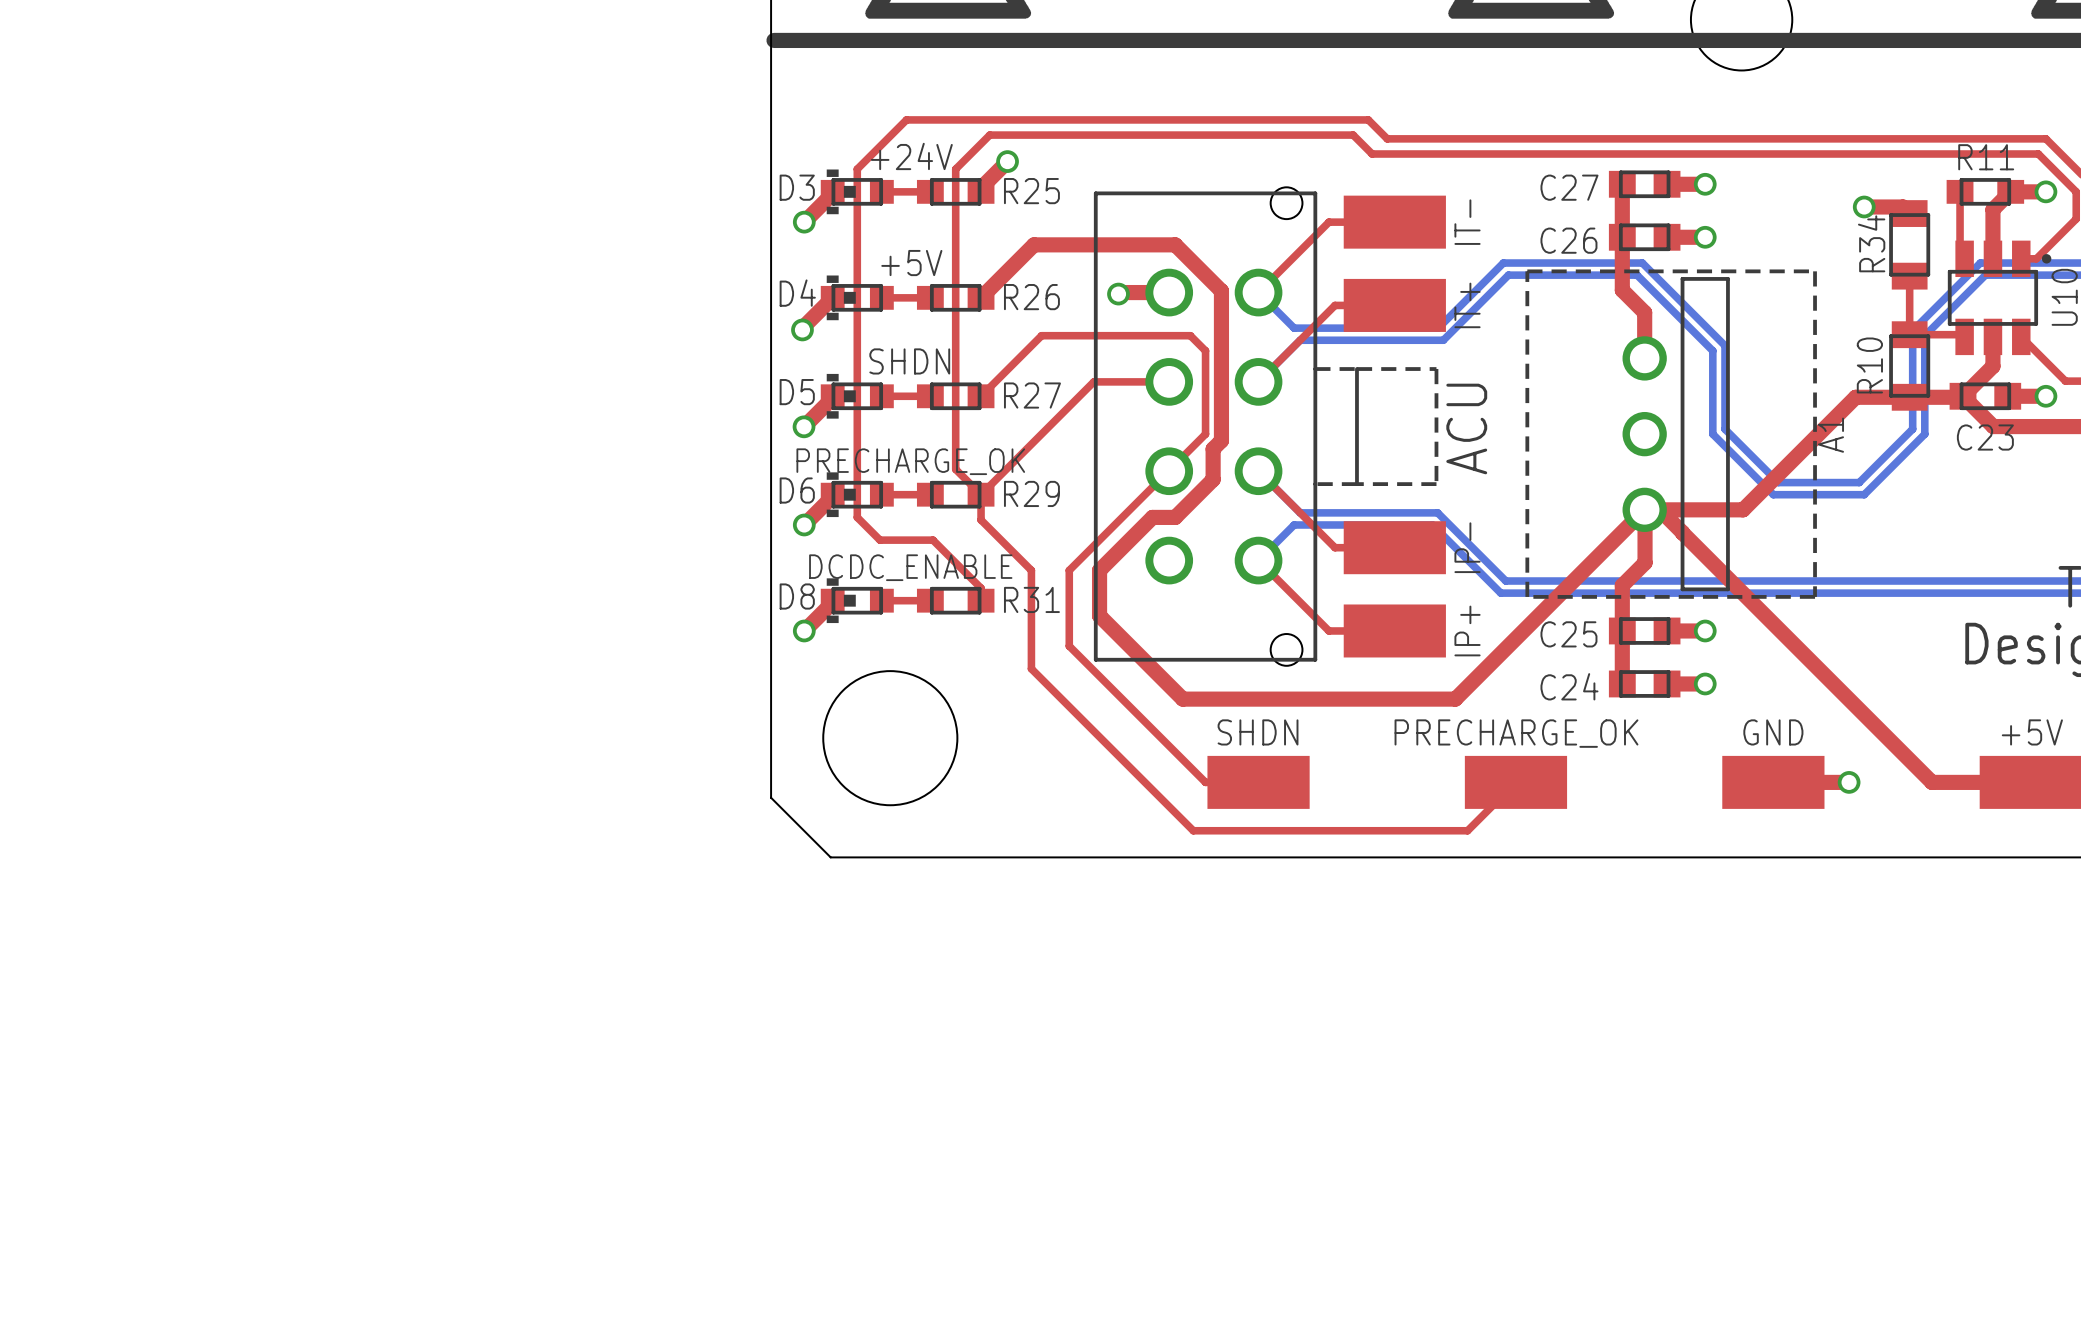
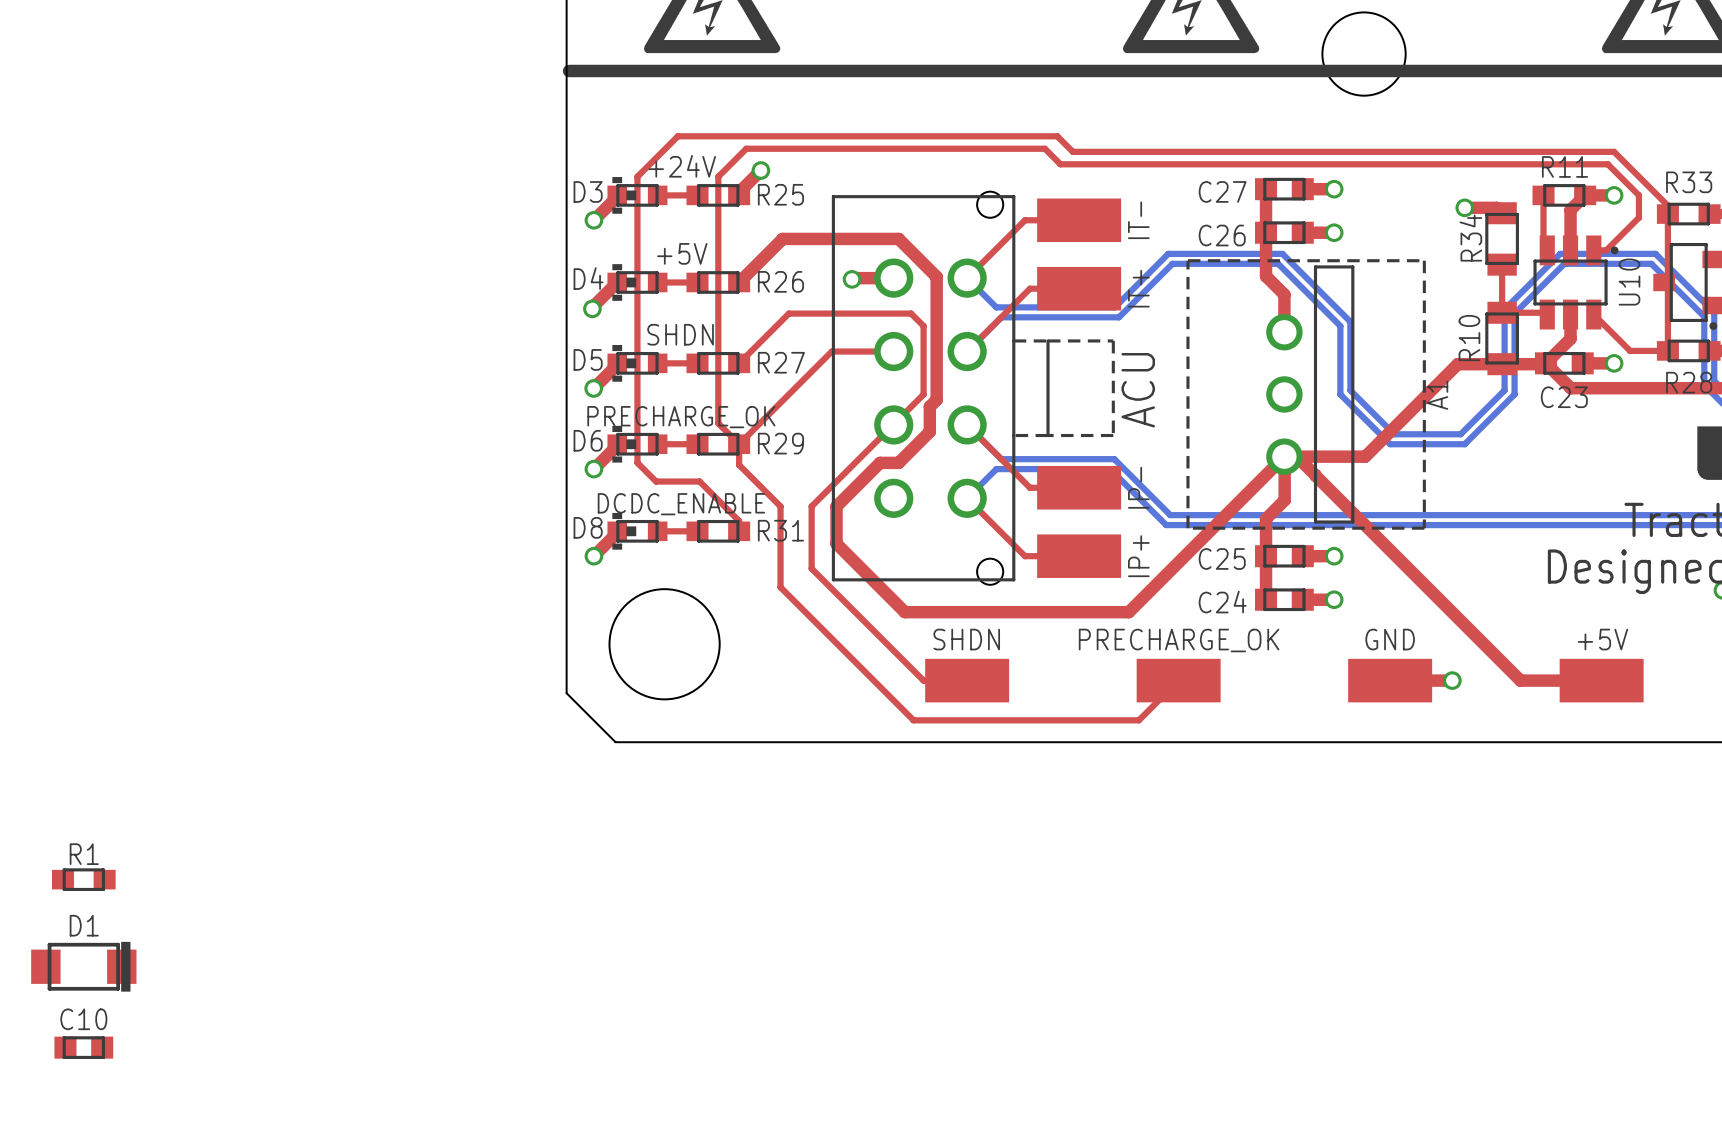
R1: none -> (83, 879)
D1: none -> (83, 966)
C10: none -> (83, 1047)

